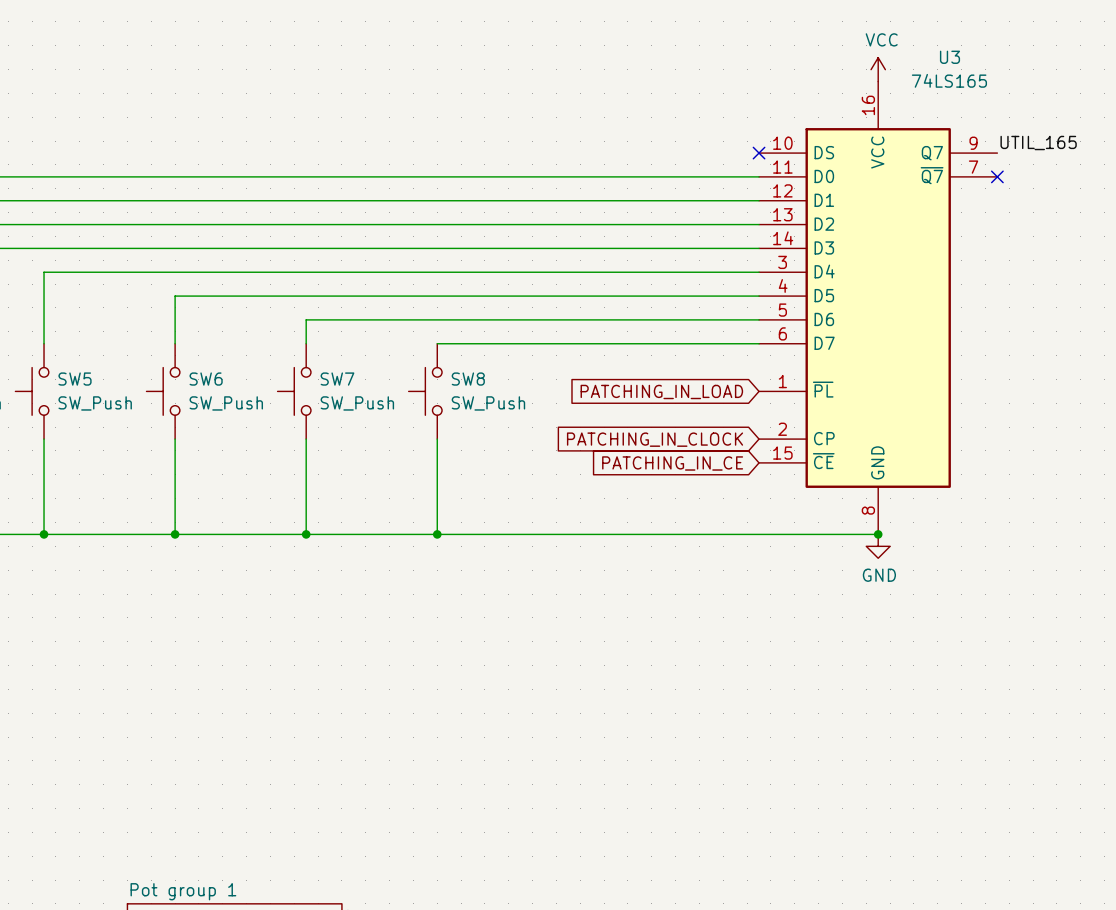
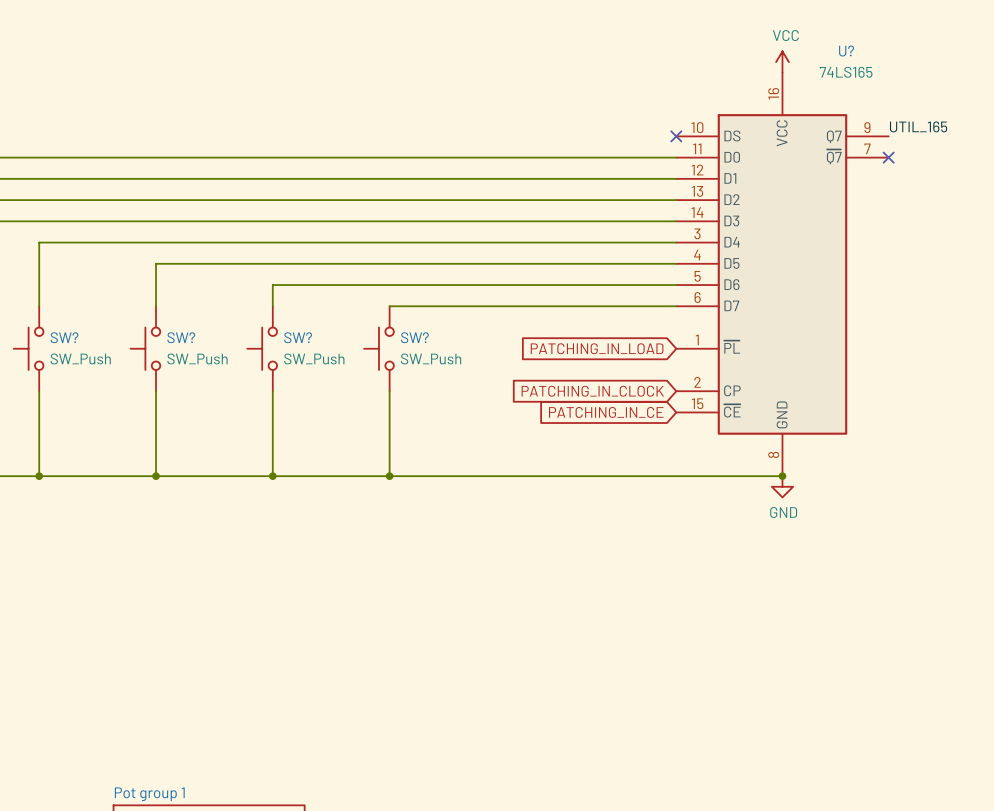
U3 name: U3 (949, 57) -> U? (846, 51)
SW5 name: SW5 (75, 379) -> SW? (64, 337)
SW6 name: SW6 (206, 379) -> SW? (181, 337)
SW7 name: SW7 (337, 379) -> SW? (298, 337)
SW8 name: SW8 (468, 379) -> SW? (414, 337)

